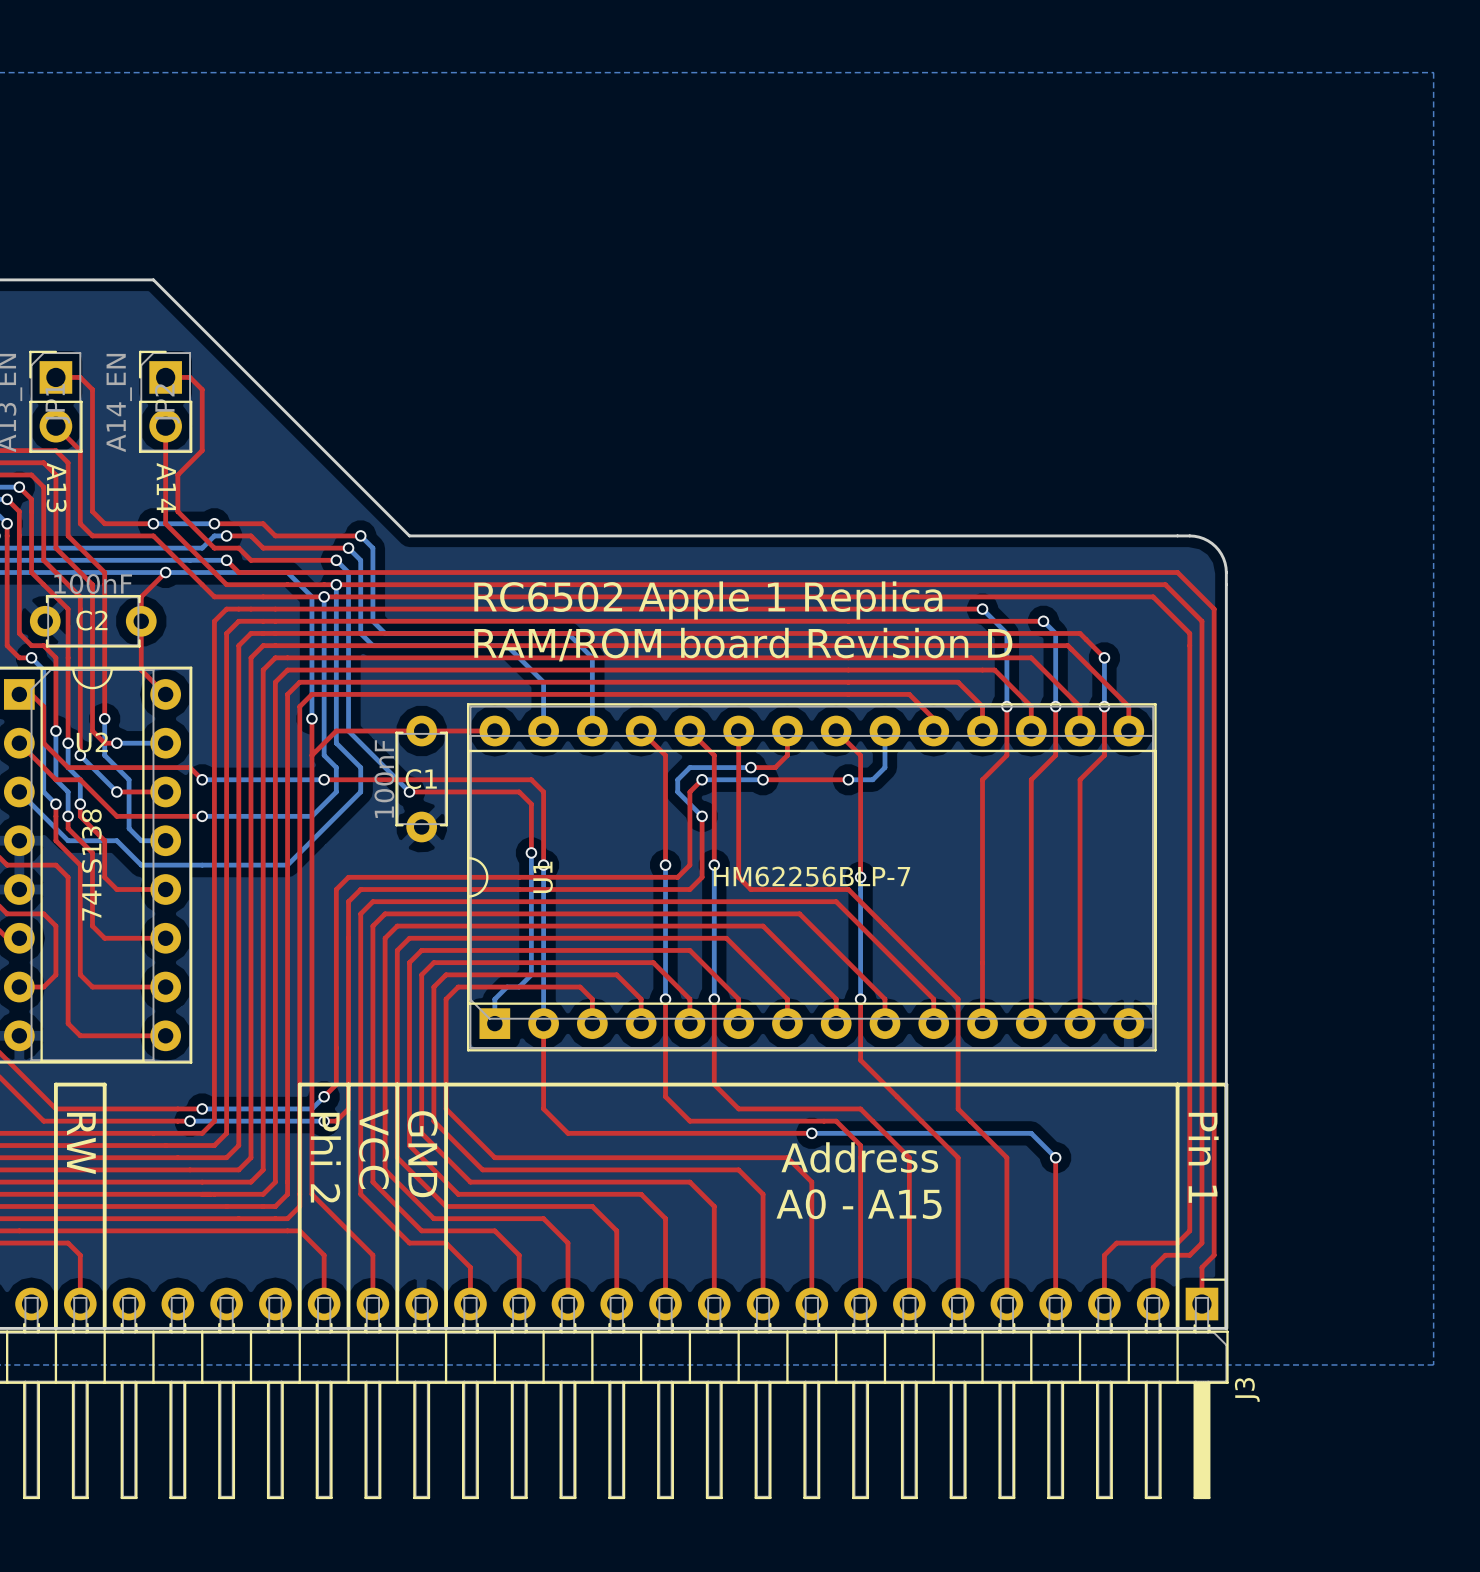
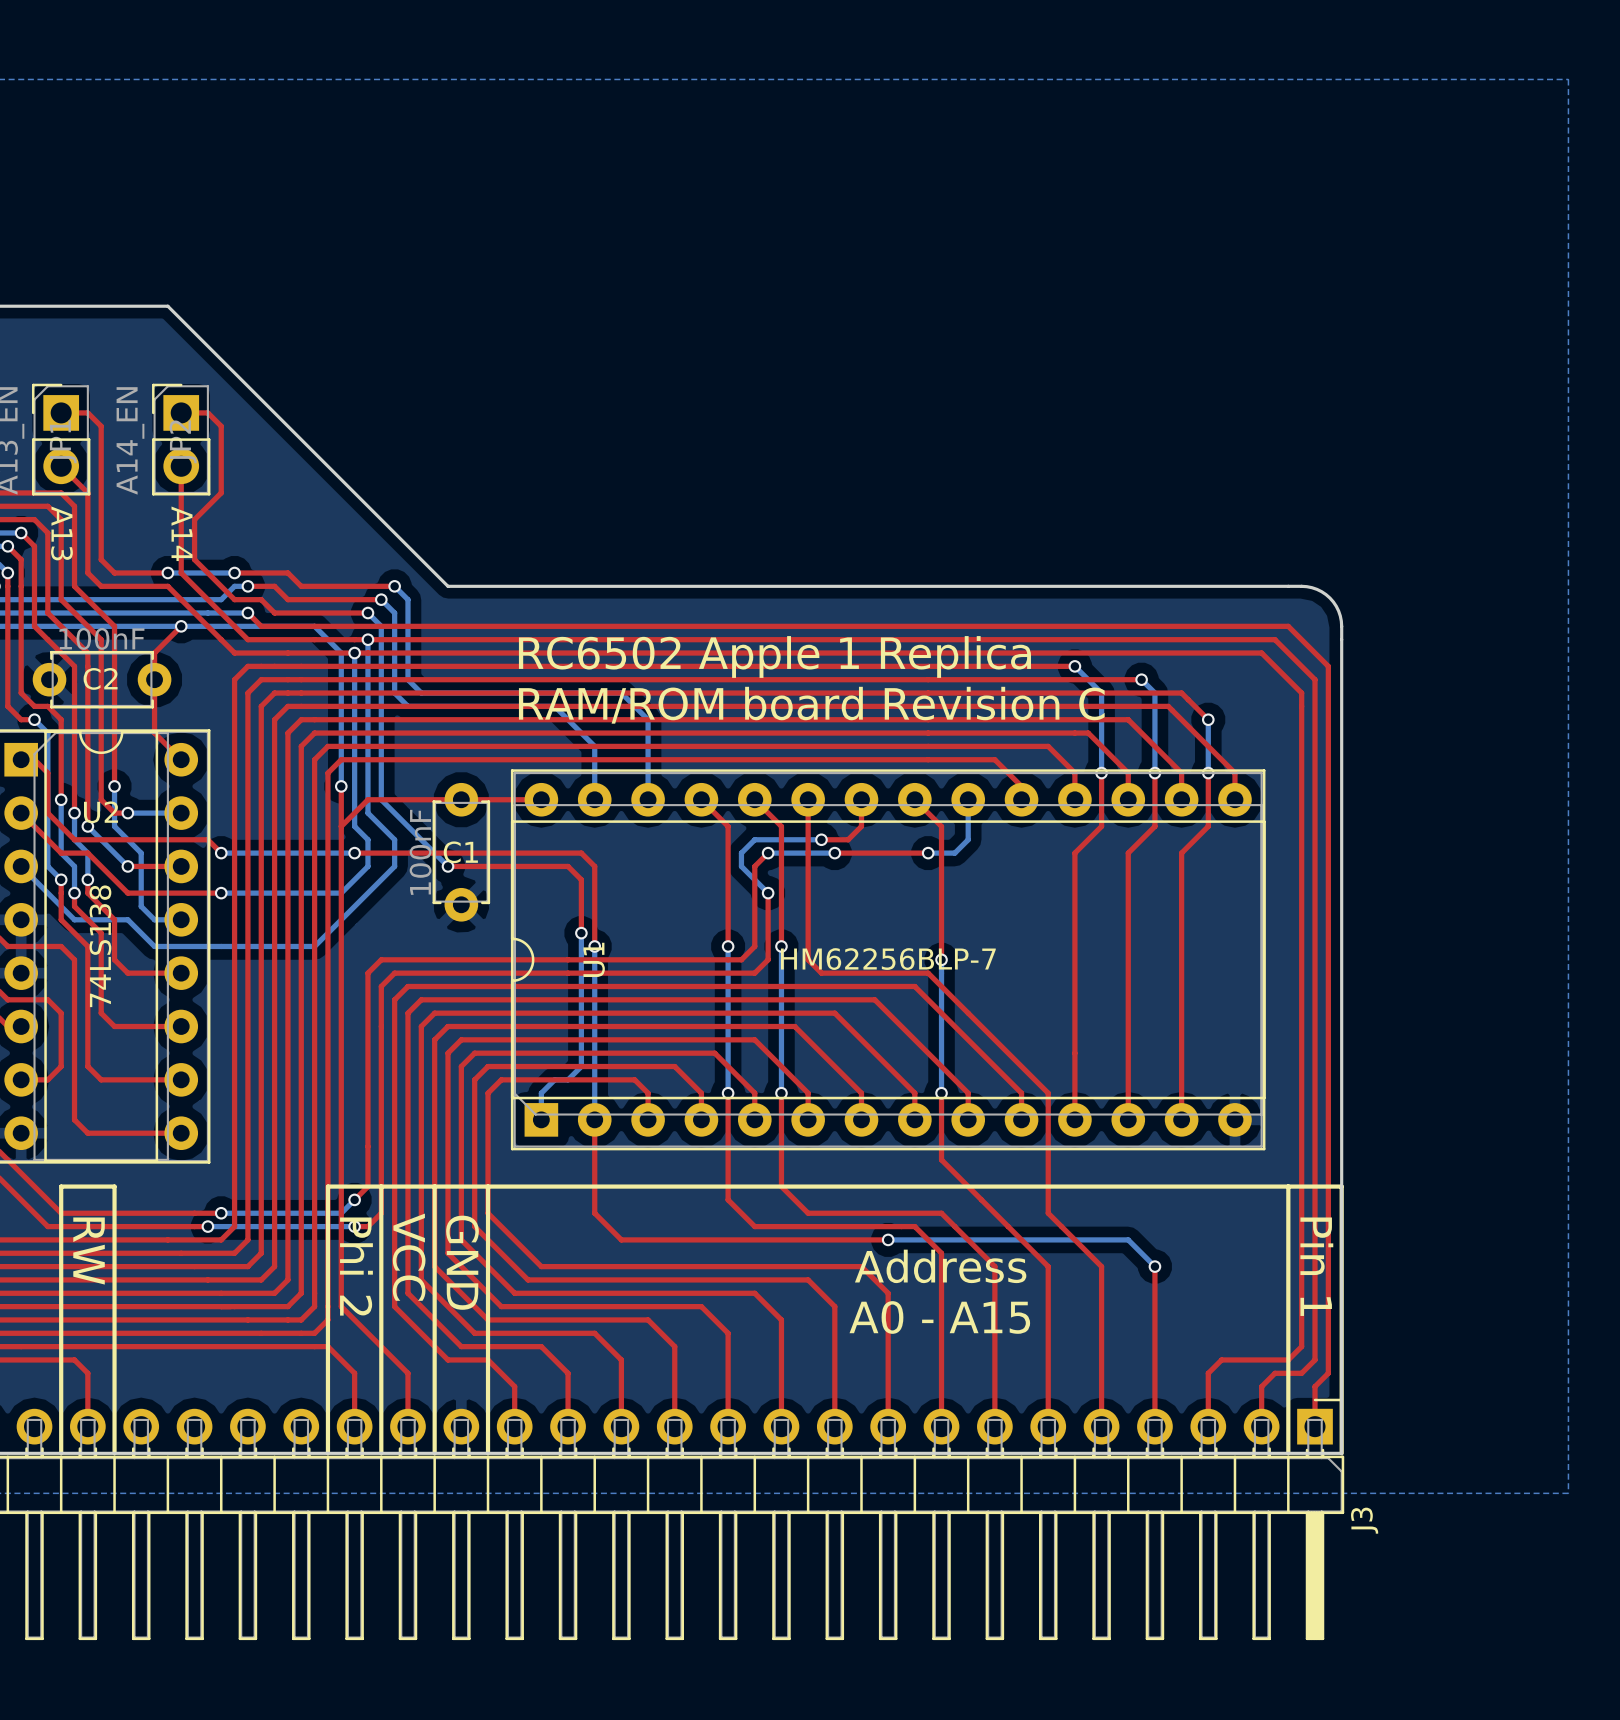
text: RAM/ROM board Revision D (743, 644) -> RAM/ROM board Revision C (811, 705)

